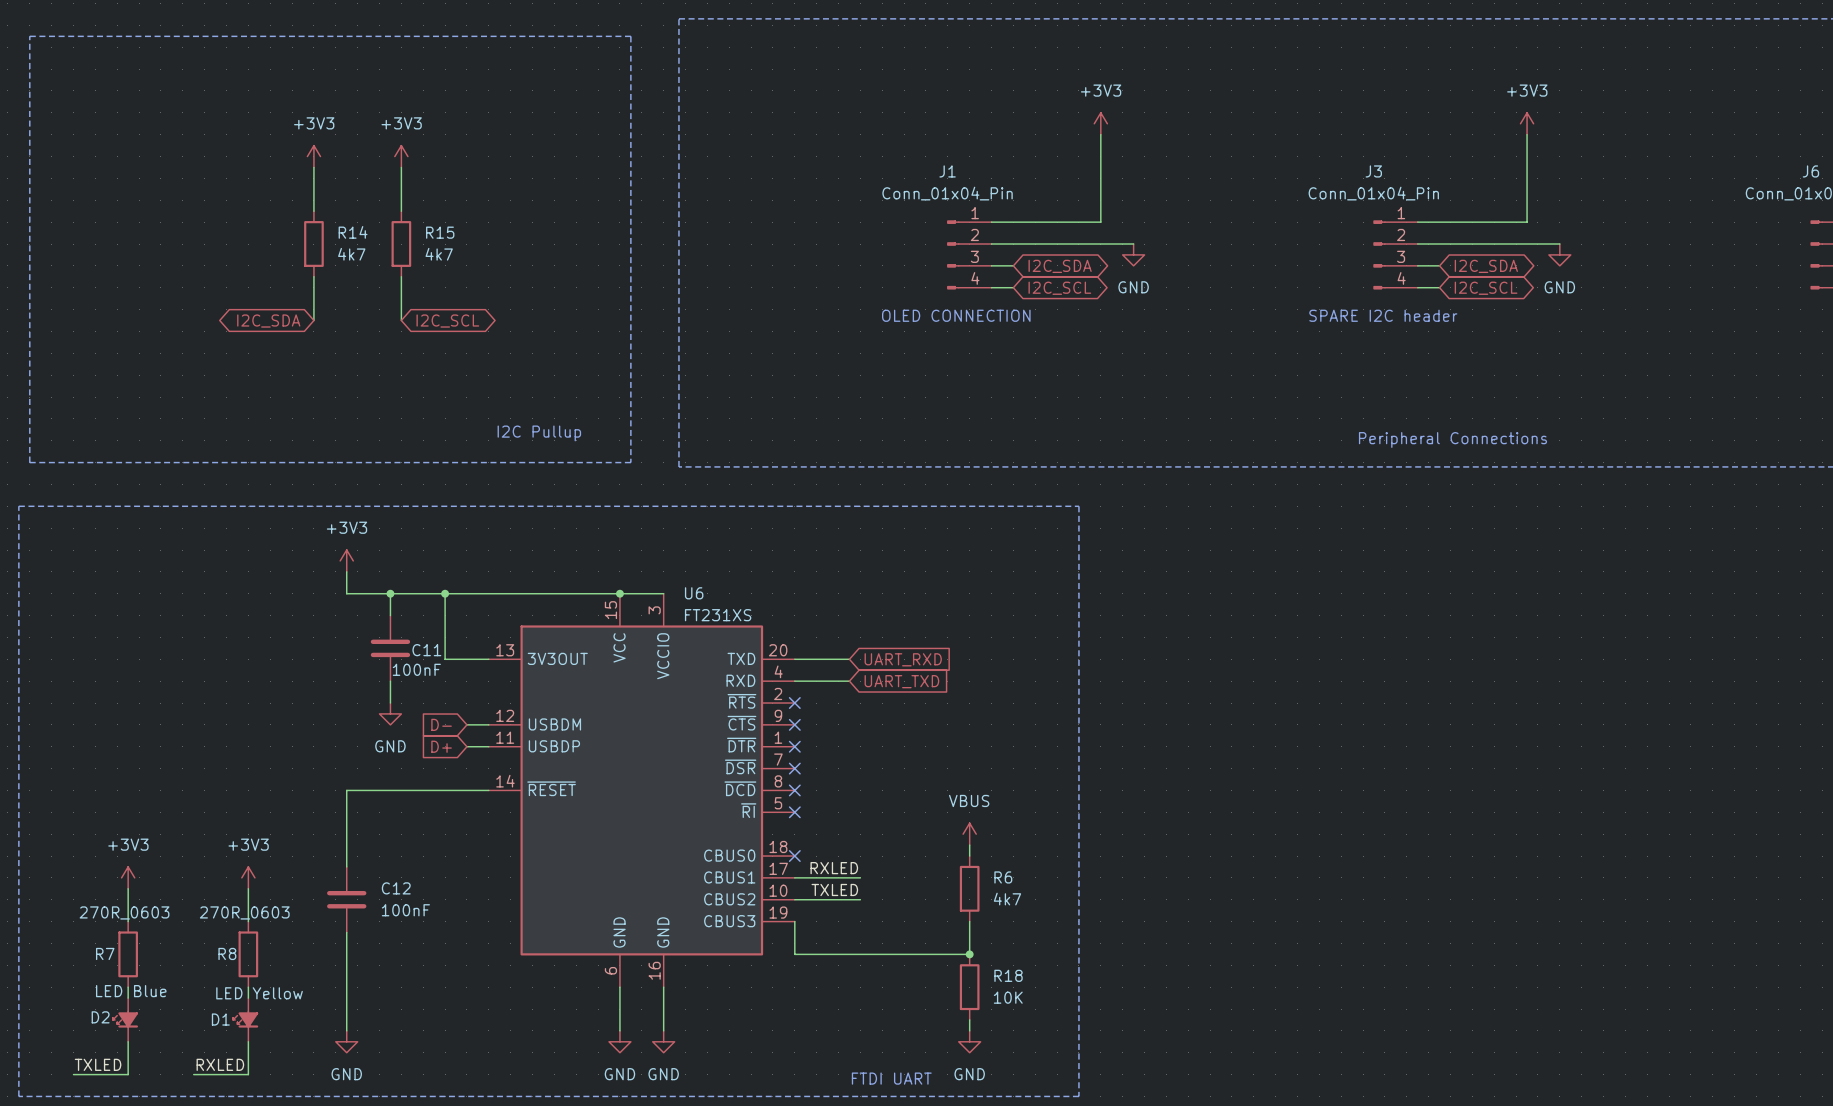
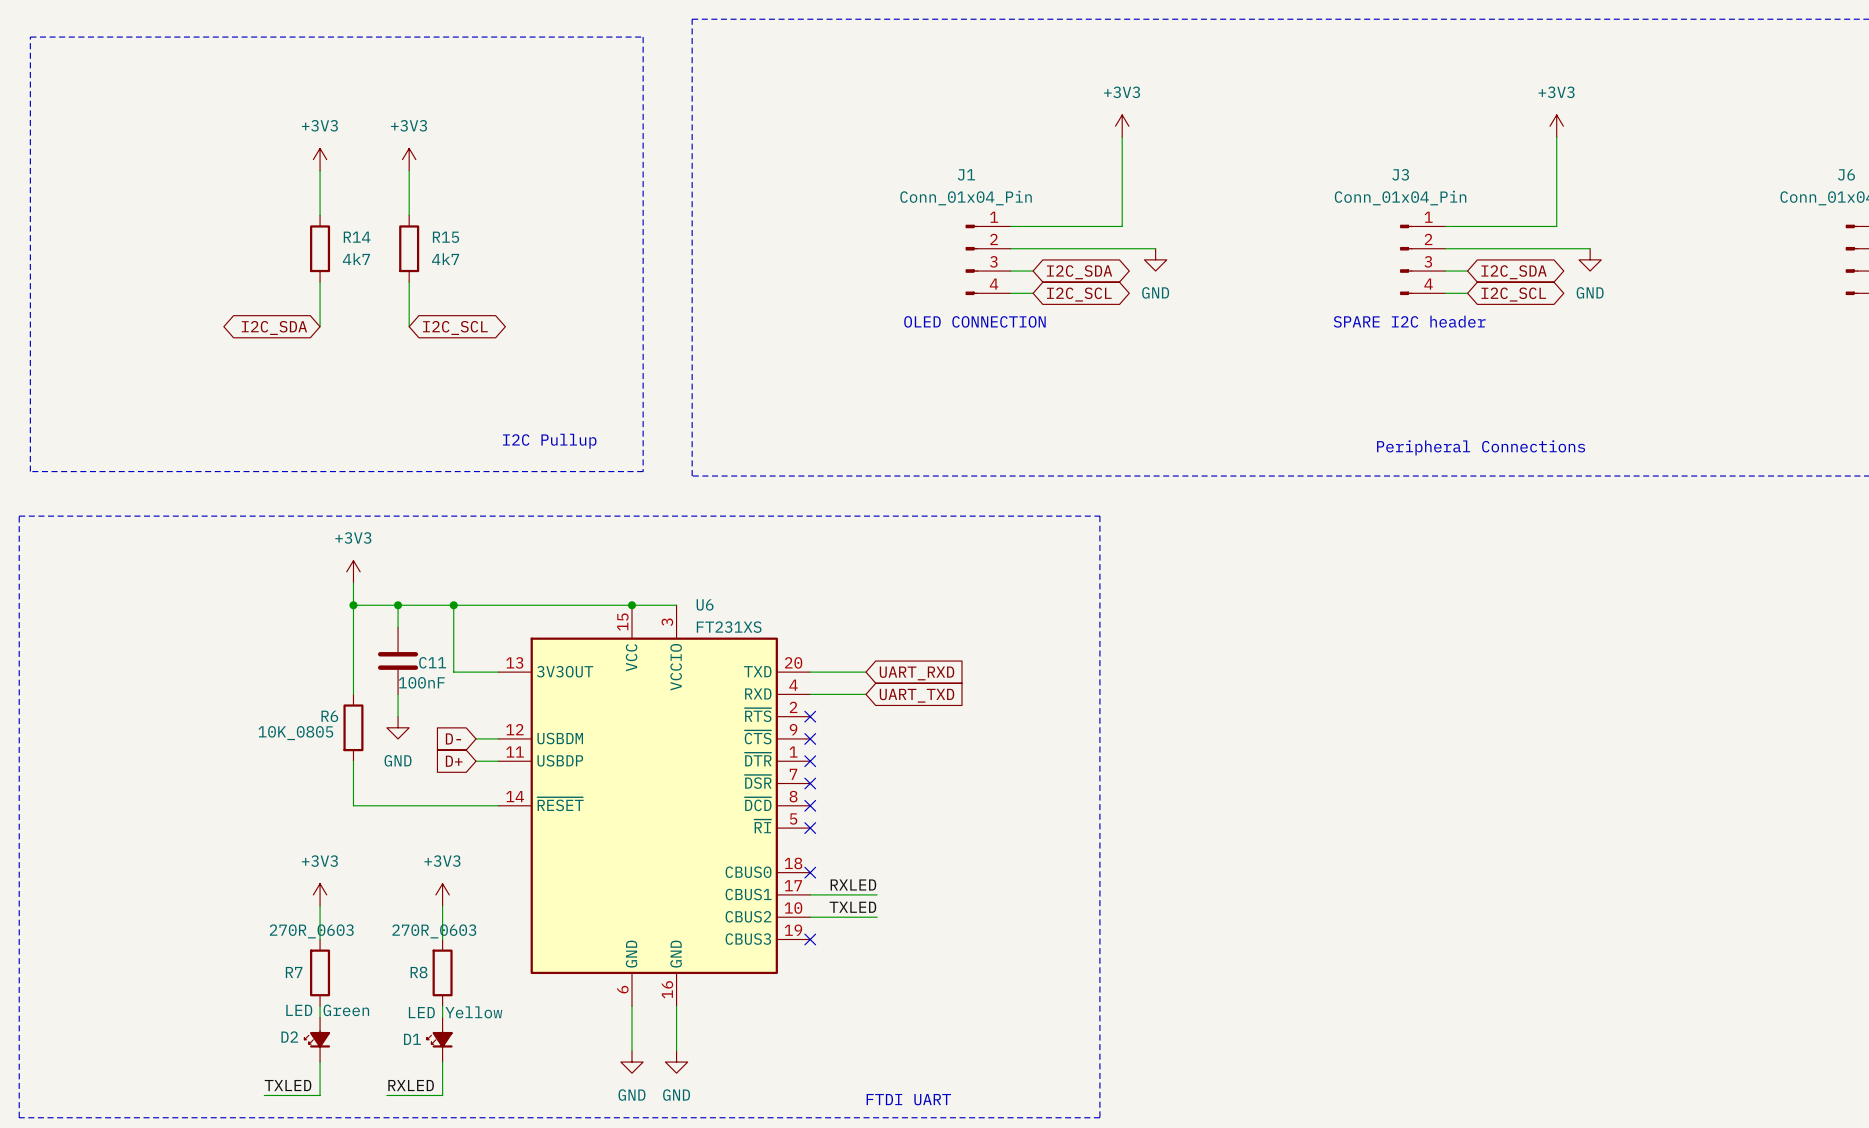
wire: none -> (353, 605) (353, 694)
junction: none -> (353, 605)
wire: (346, 790) (346, 866) -> (353, 805) (353, 761)
power symbol: VBUS (969, 834) -> none
wire: (969, 845) (969, 856) -> none
power symbol: +3V3 (128, 877) -> none
power symbol position: +3V3 (248, 877) -> +3V3 (320, 894)
power symbol: none -> +3V3 (442, 894)
R6 name position: R6 (1003, 877) -> R6 (329, 716)
wire: (128, 888) (128, 921) -> (320, 906) (320, 939)
wire: (248, 888) (248, 921) -> (442, 906) (442, 939)
R6 position: (969, 888) -> (353, 727)
C12: 100nF (346, 899) -> none
R6 value: 4k7 (1007, 899) -> 10K_0805 (295, 733)
wire: (794, 921) (794, 954) (969, 954) (969, 921) -> none
no-connect mark: none -> (810, 939)
wire: (346, 932) (346, 1030) -> none
R7 position: (128, 954) -> (320, 972)
R8 position: (248, 954) -> (442, 972)
junction: (969, 954) -> none
wire: (128, 987) (128, 998) -> (320, 1006) (320, 1017)
wire: (248, 987) (248, 998) -> (442, 1006) (442, 1017)
R18: 10K (969, 987) -> none
D2 value: LED Blue (131, 991) -> LED Green (327, 1010)
D2 position: (125, 1019) -> (317, 1039)
D1 position: (245, 1019) -> (439, 1039)
wire: (969, 1019) (969, 1030) -> none
wire: (128, 1041) (128, 1074) (73, 1074) -> (320, 1062) (320, 1095) (264, 1095)
wire: (248, 1041) (248, 1074) (193, 1074) -> (442, 1062) (442, 1095) (386, 1095)
power symbol: GND (346, 1041) -> none
power symbol: GND (969, 1041) -> none
label position: TXLED (98, 1064) -> TXLED (288, 1085)
label position: RXLED (220, 1064) -> RXLED (411, 1085)

